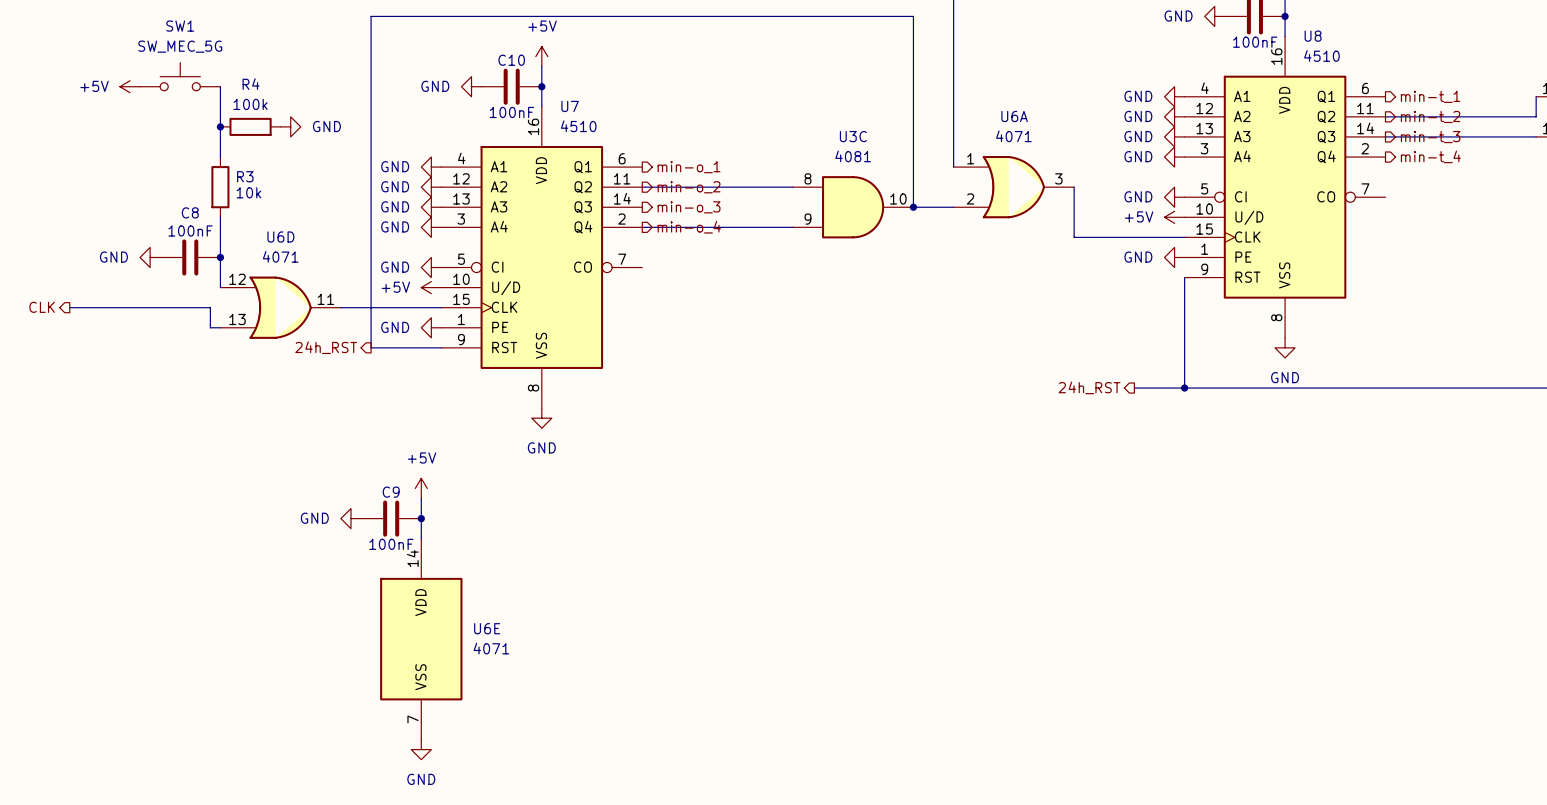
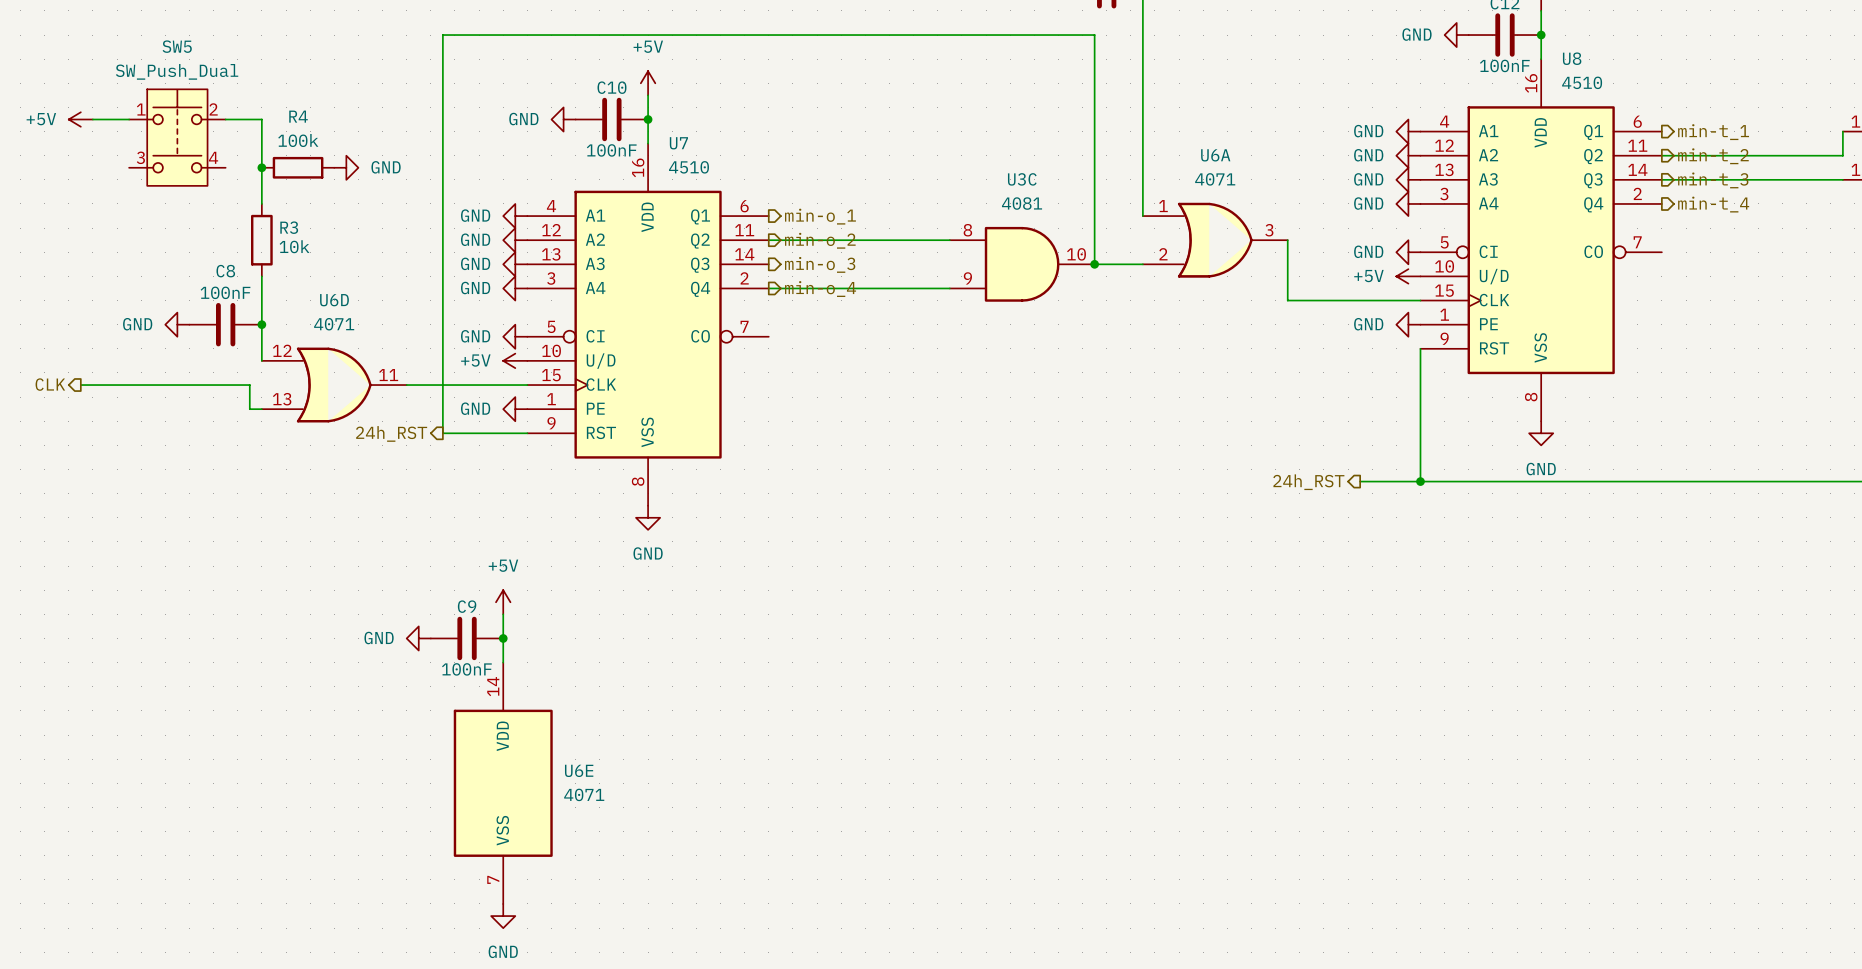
SW1: SW_MEC_5G (180, 76) -> none
wire: none -> (92, 119) (129, 119)
power symbol position: +5V (130, 86) -> +5V (80, 119)
SW5: none -> SW_Push_Dual (177, 137)

